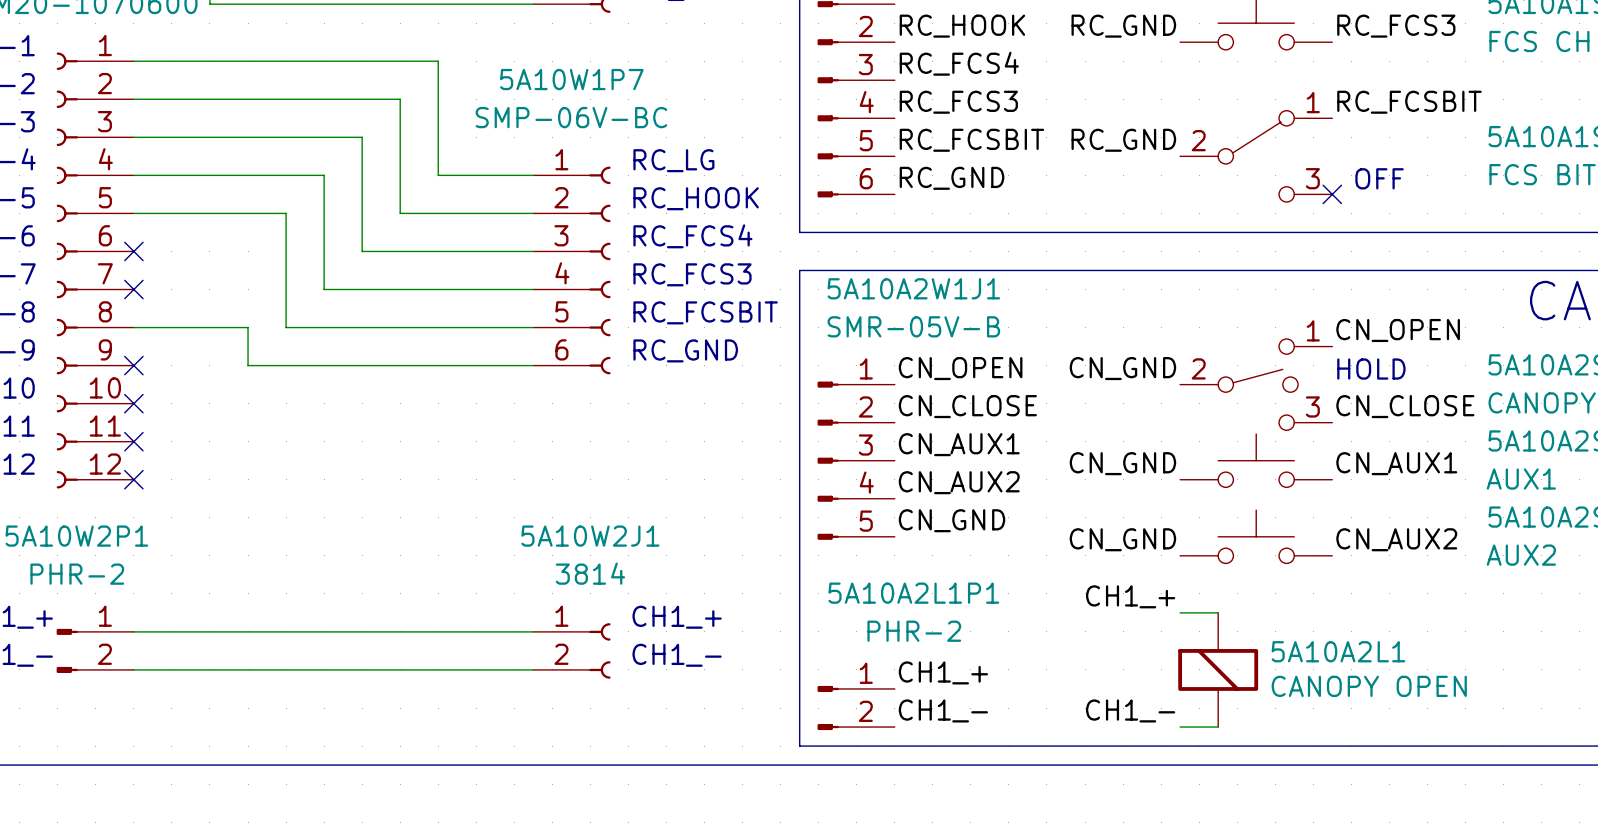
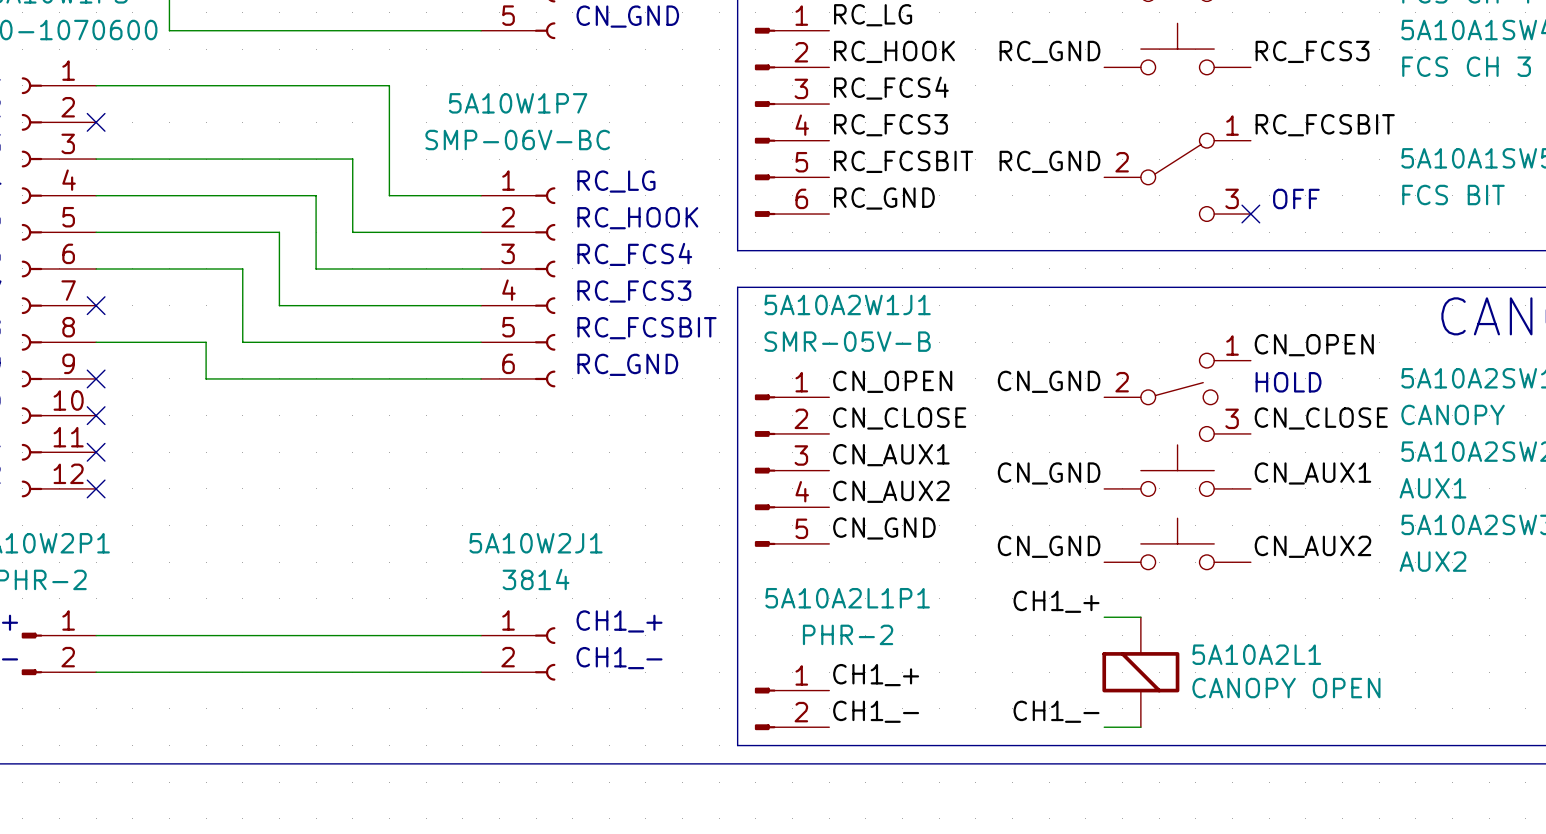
wire: (133, 99) (400, 99) (400, 137) -> none
no-connect mark: none -> (96, 122)
wire: (362, 137) (362, 175) -> (316, 159) (352, 159)
wire: (324, 175) (324, 213) -> (279, 195) (316, 195)
wire: (286, 213) (286, 251) -> (242, 232) (279, 232)
wire: none -> (96, 268) (242, 268)
no-connect mark: (133, 251) -> none

